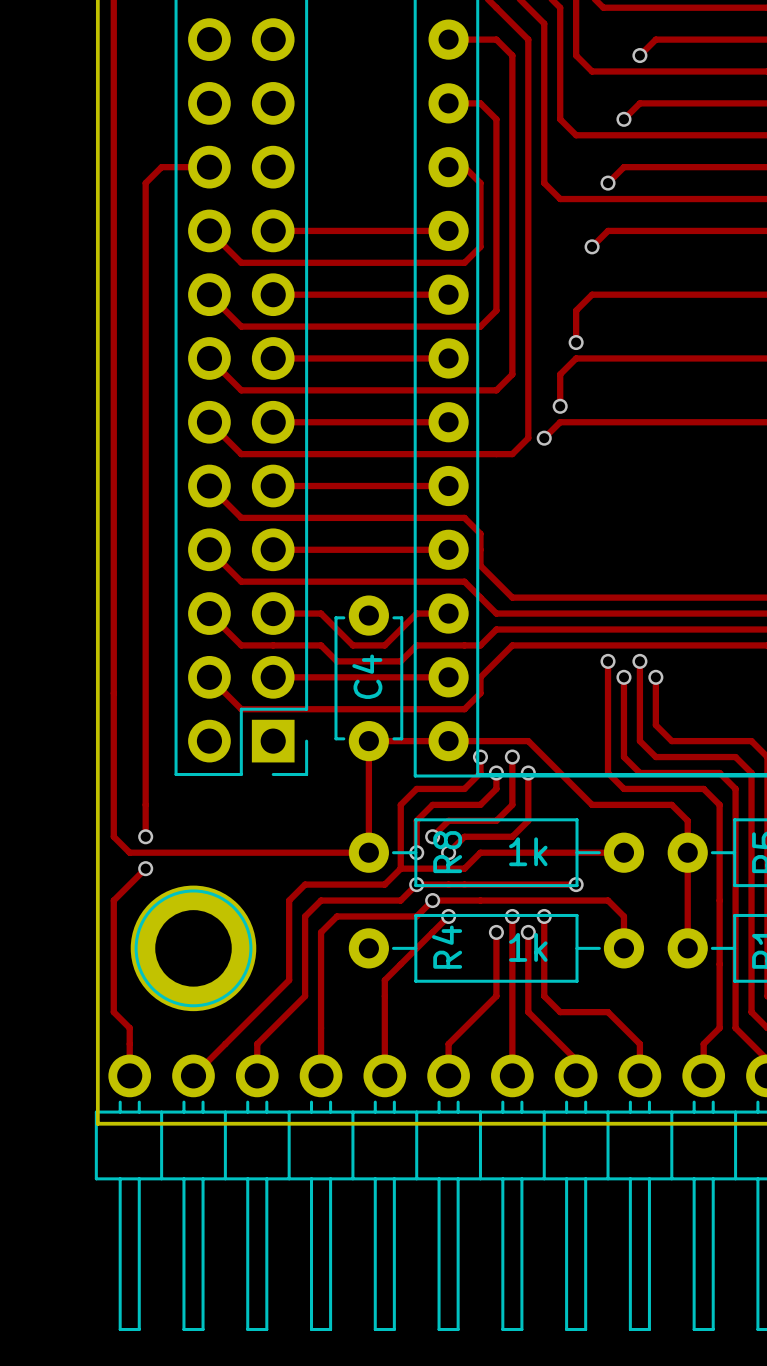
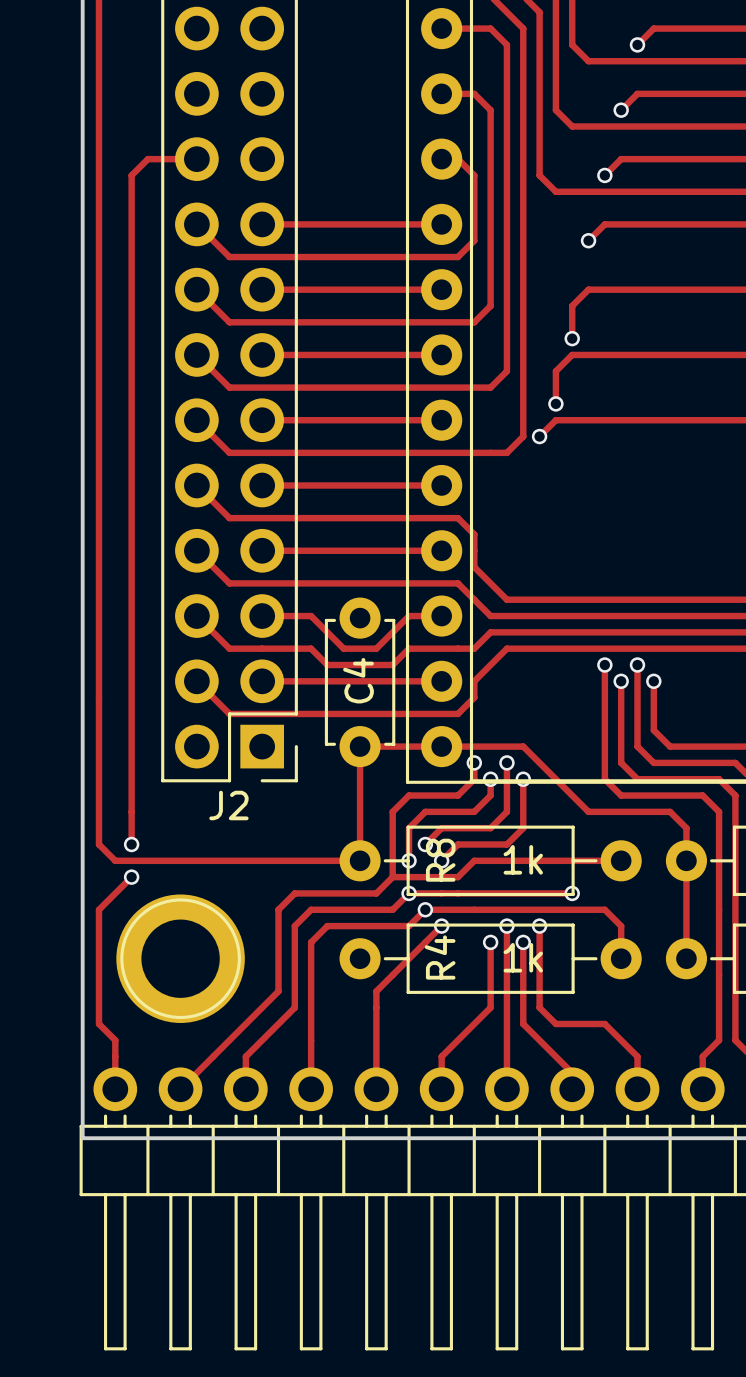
J2 name: none -> J2 (228, 805)

